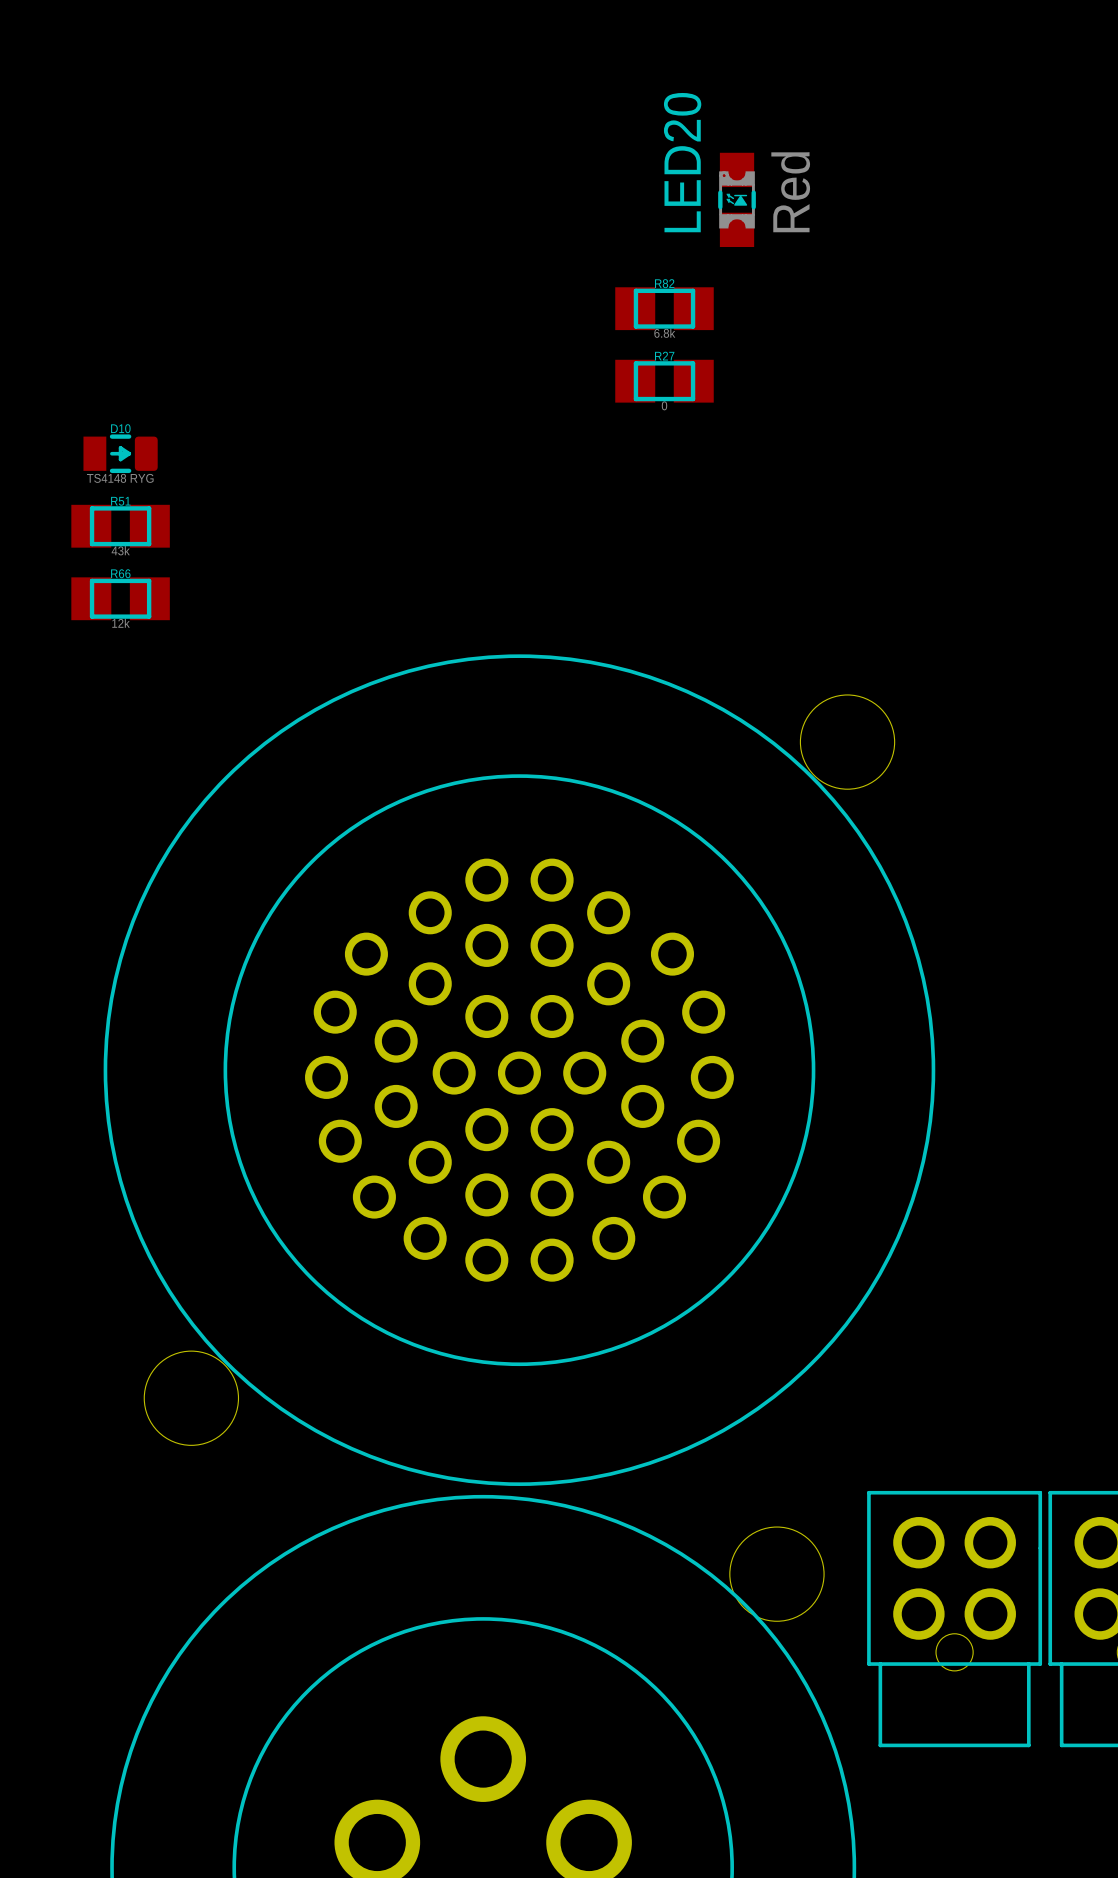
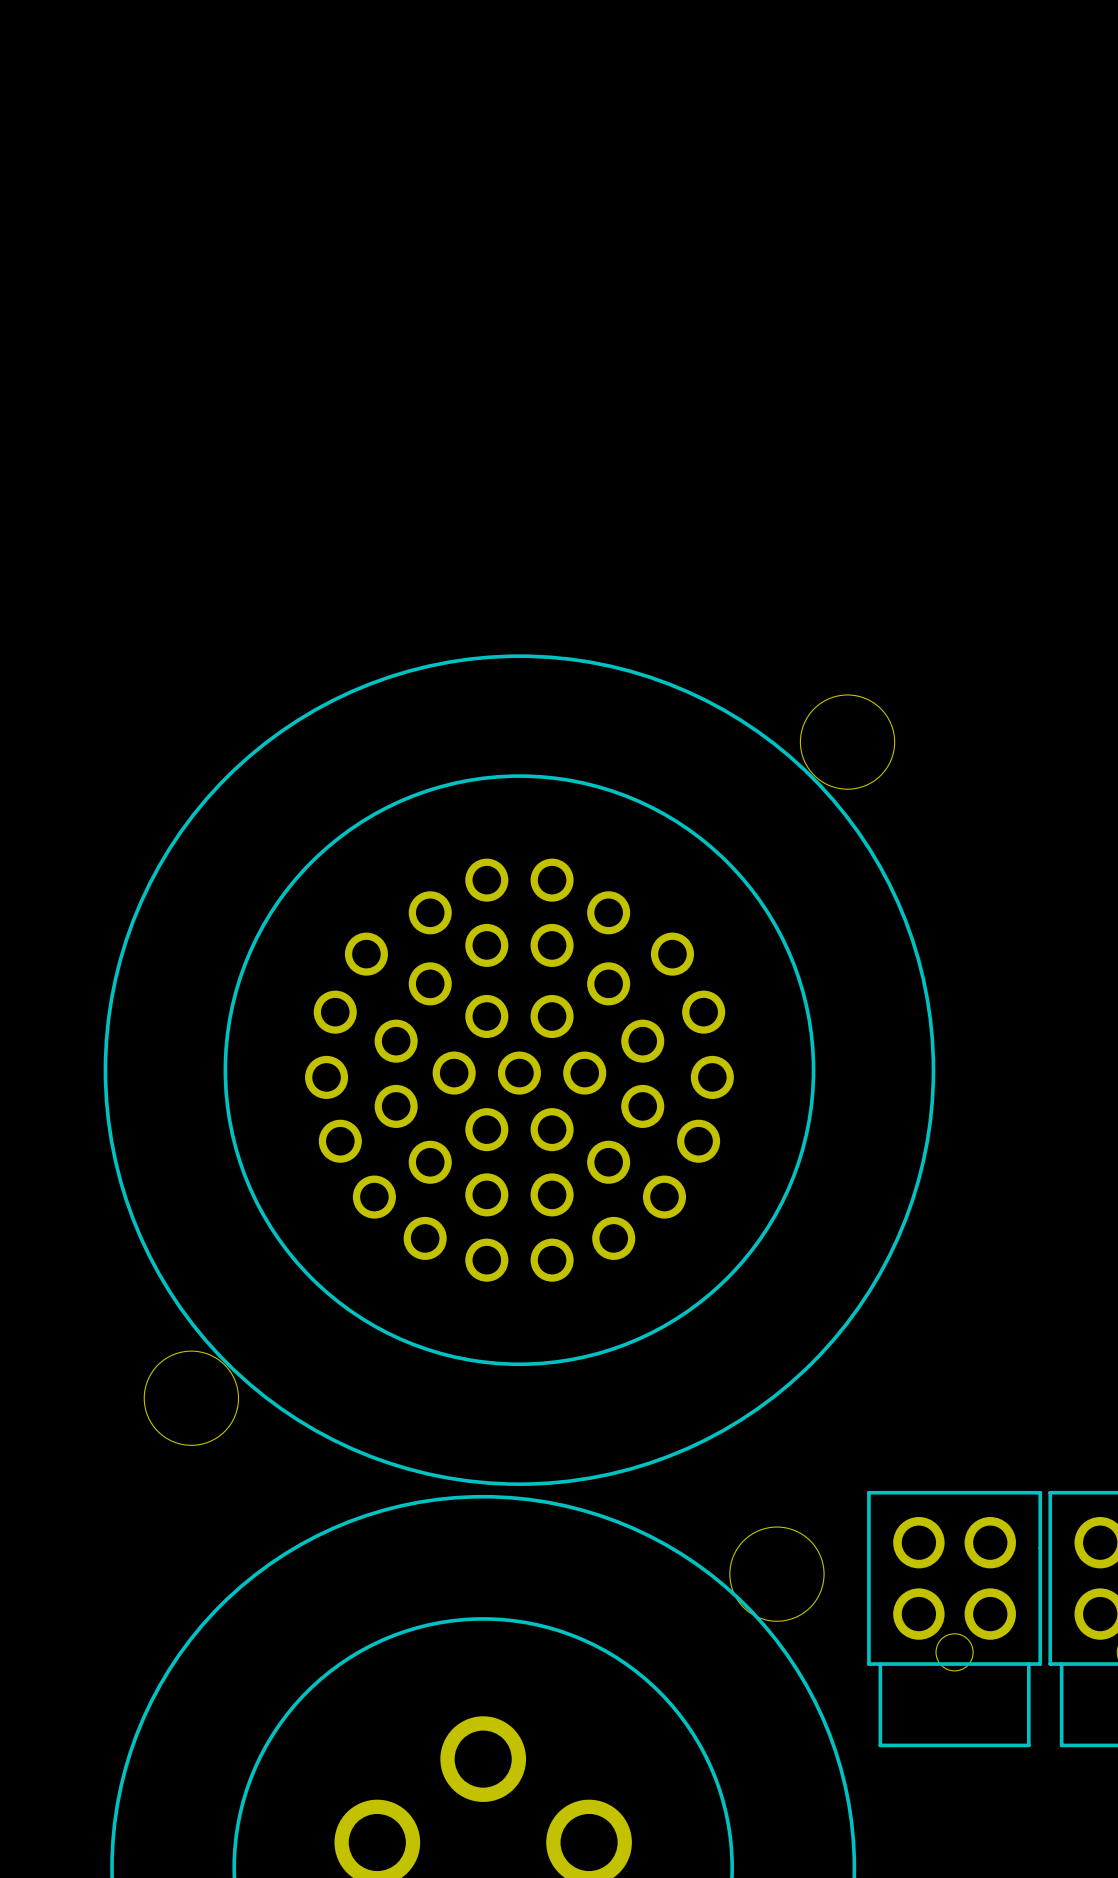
LED20: Red (737, 199) -> none
R82: 6.8k (664, 308) -> none
R27: 0 (664, 381) -> none
D10: TS4148 RYG (120, 453) -> none
R51: 43k (120, 526) -> none
R66: 12k (120, 598) -> none

